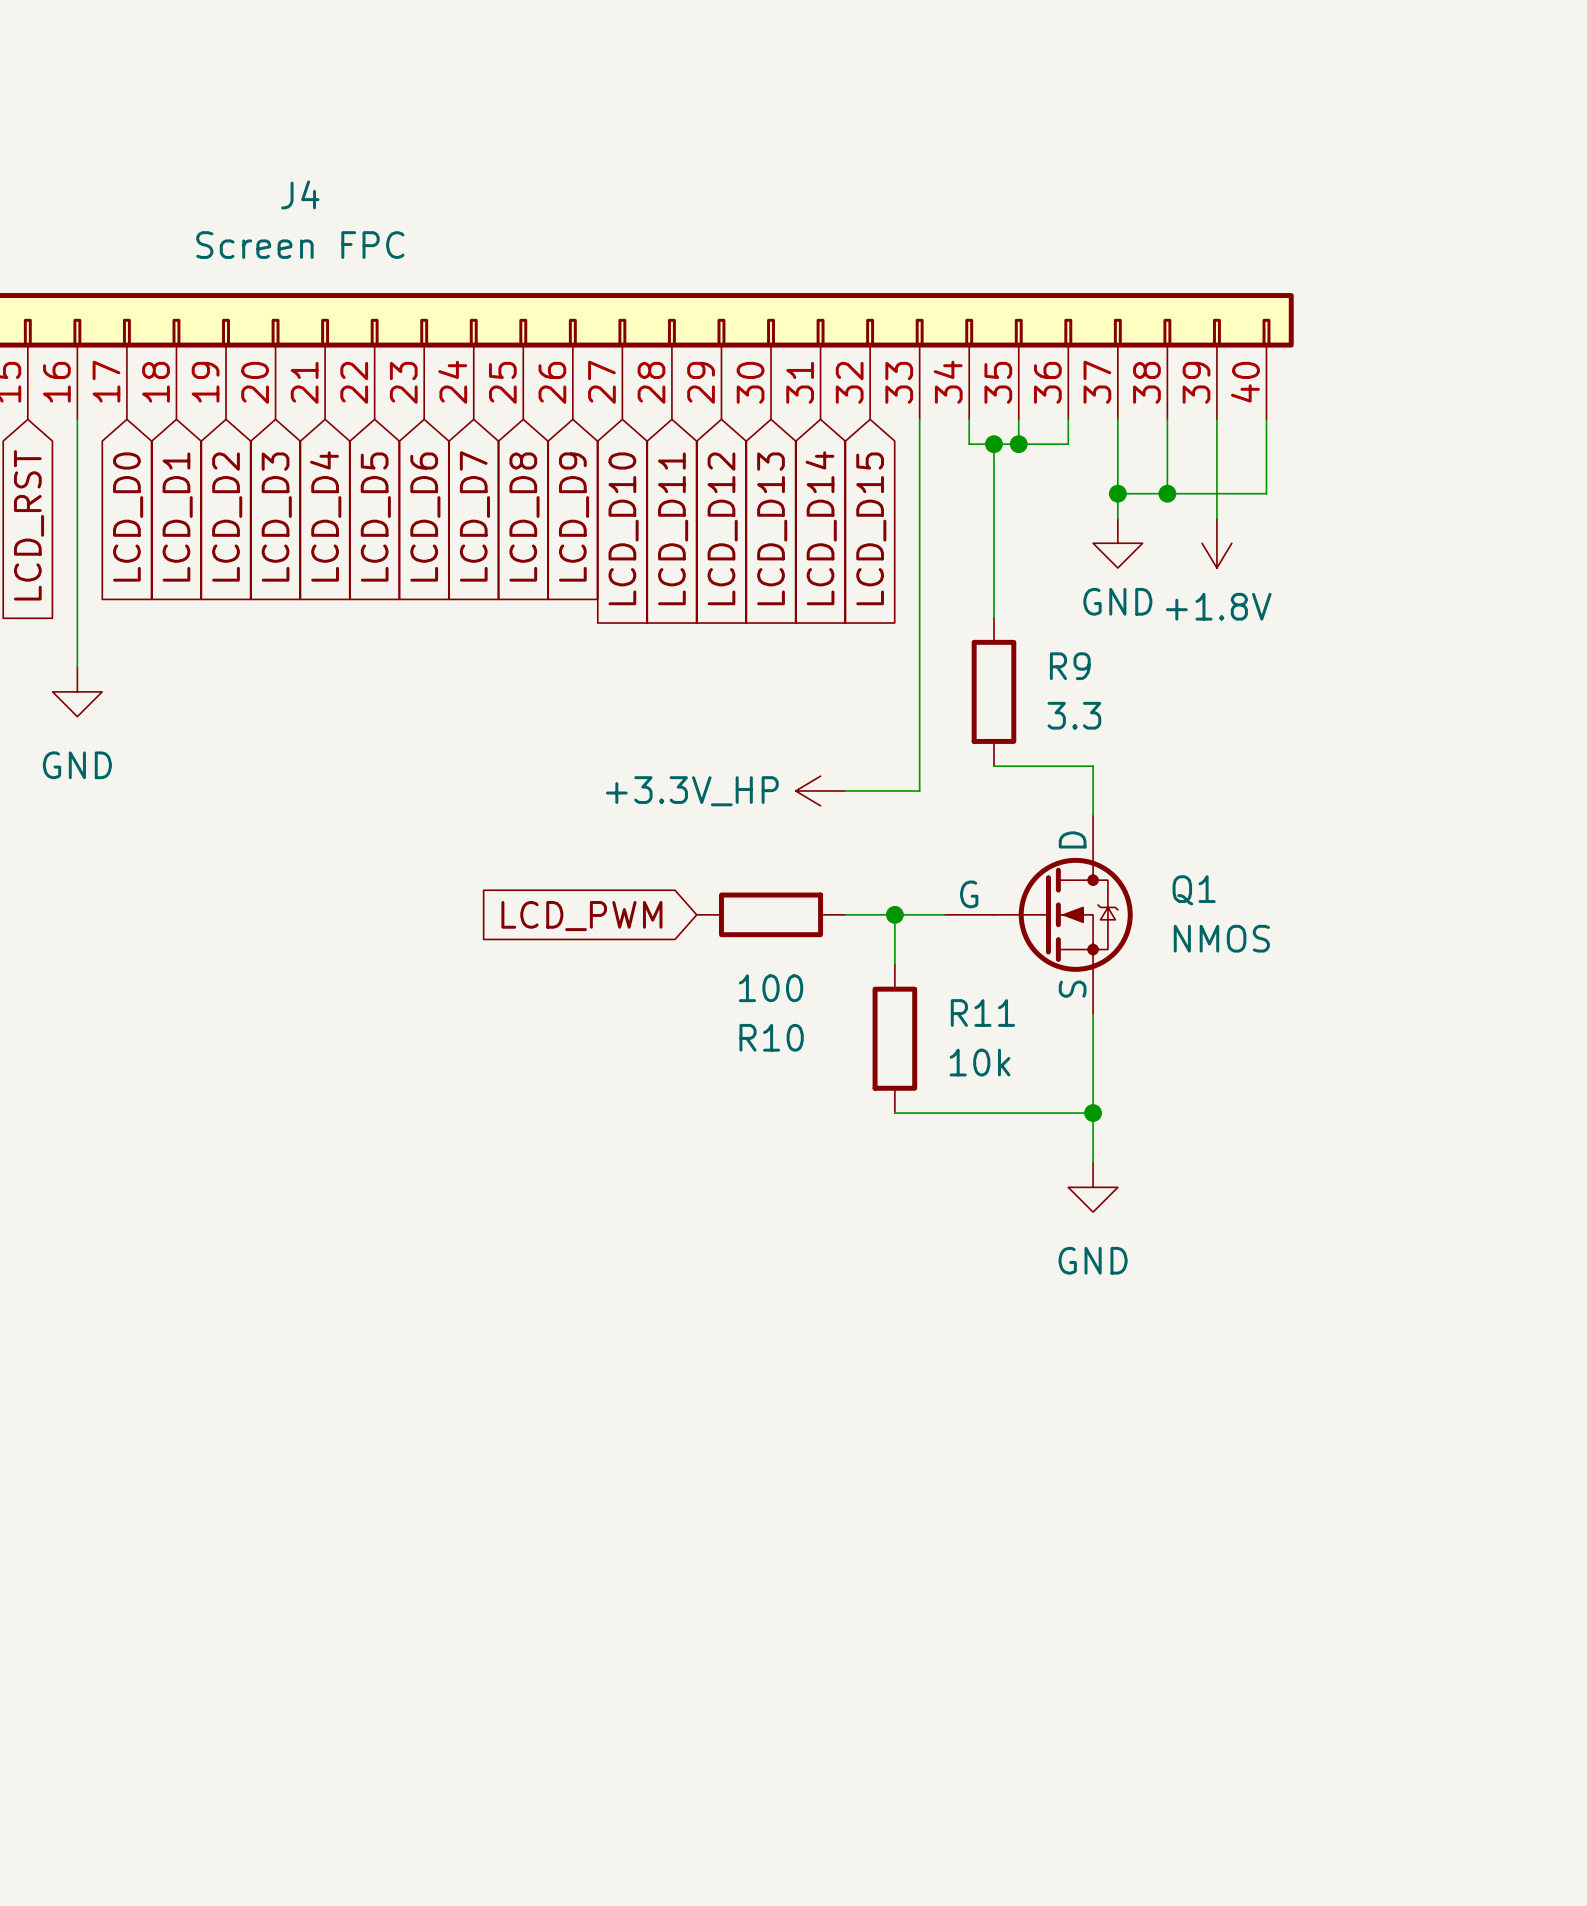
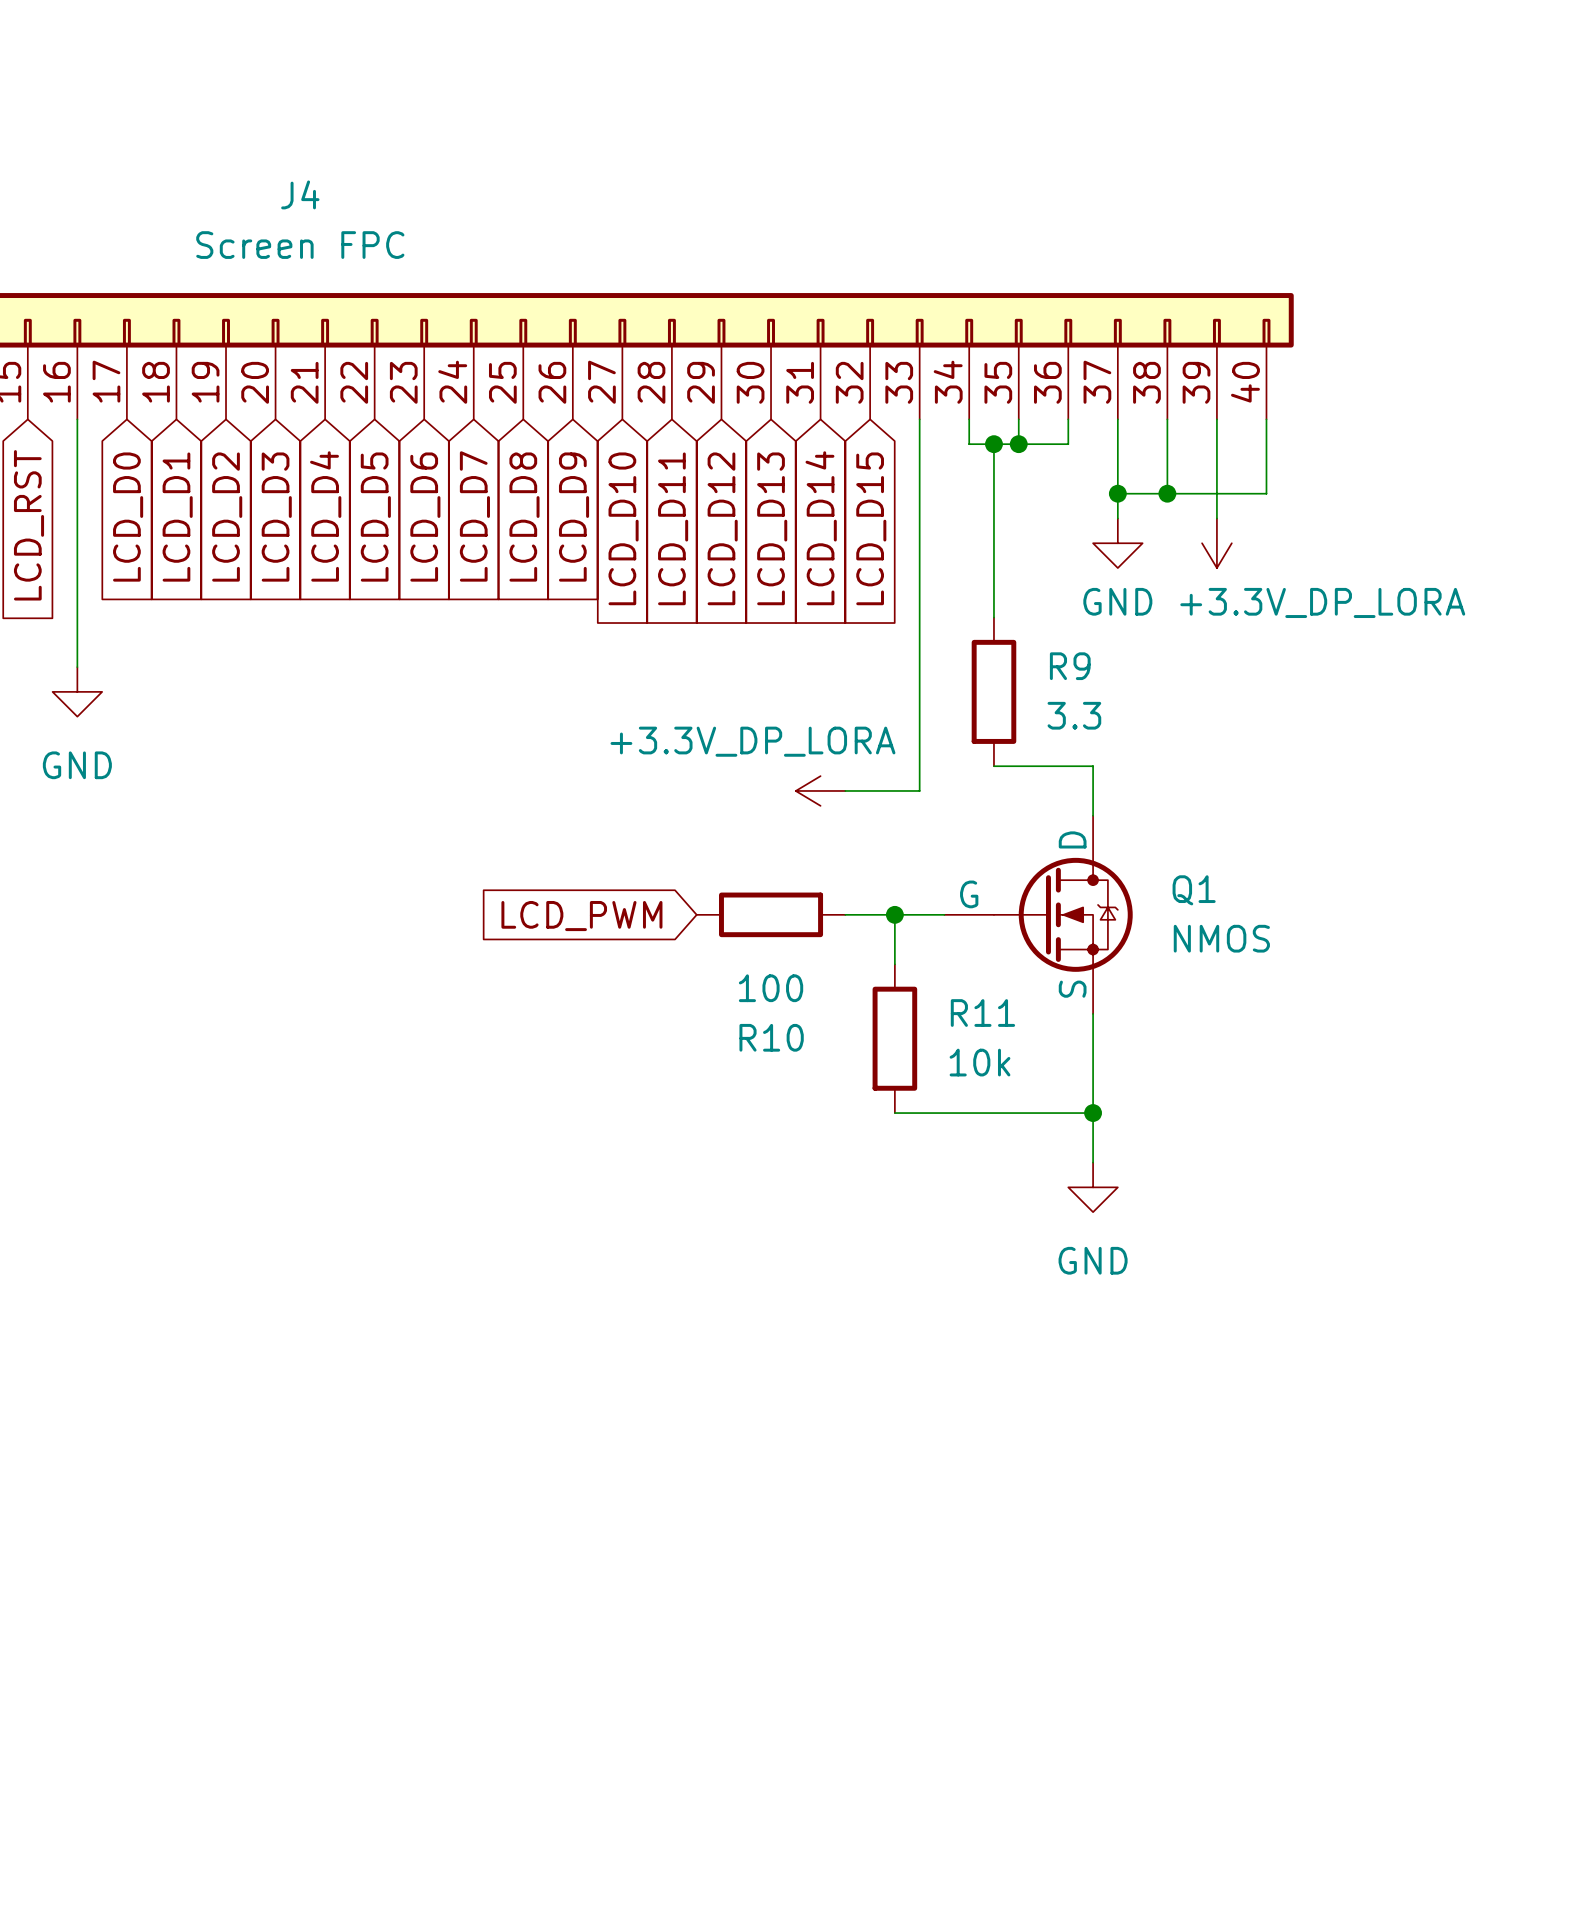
power symbol: +1.8V (1216, 543) -> +3.3V_DP_LORA (1216, 543)
power symbol: +3.3V_HP (820, 790) -> +3.3V_DP_LORA (820, 790)

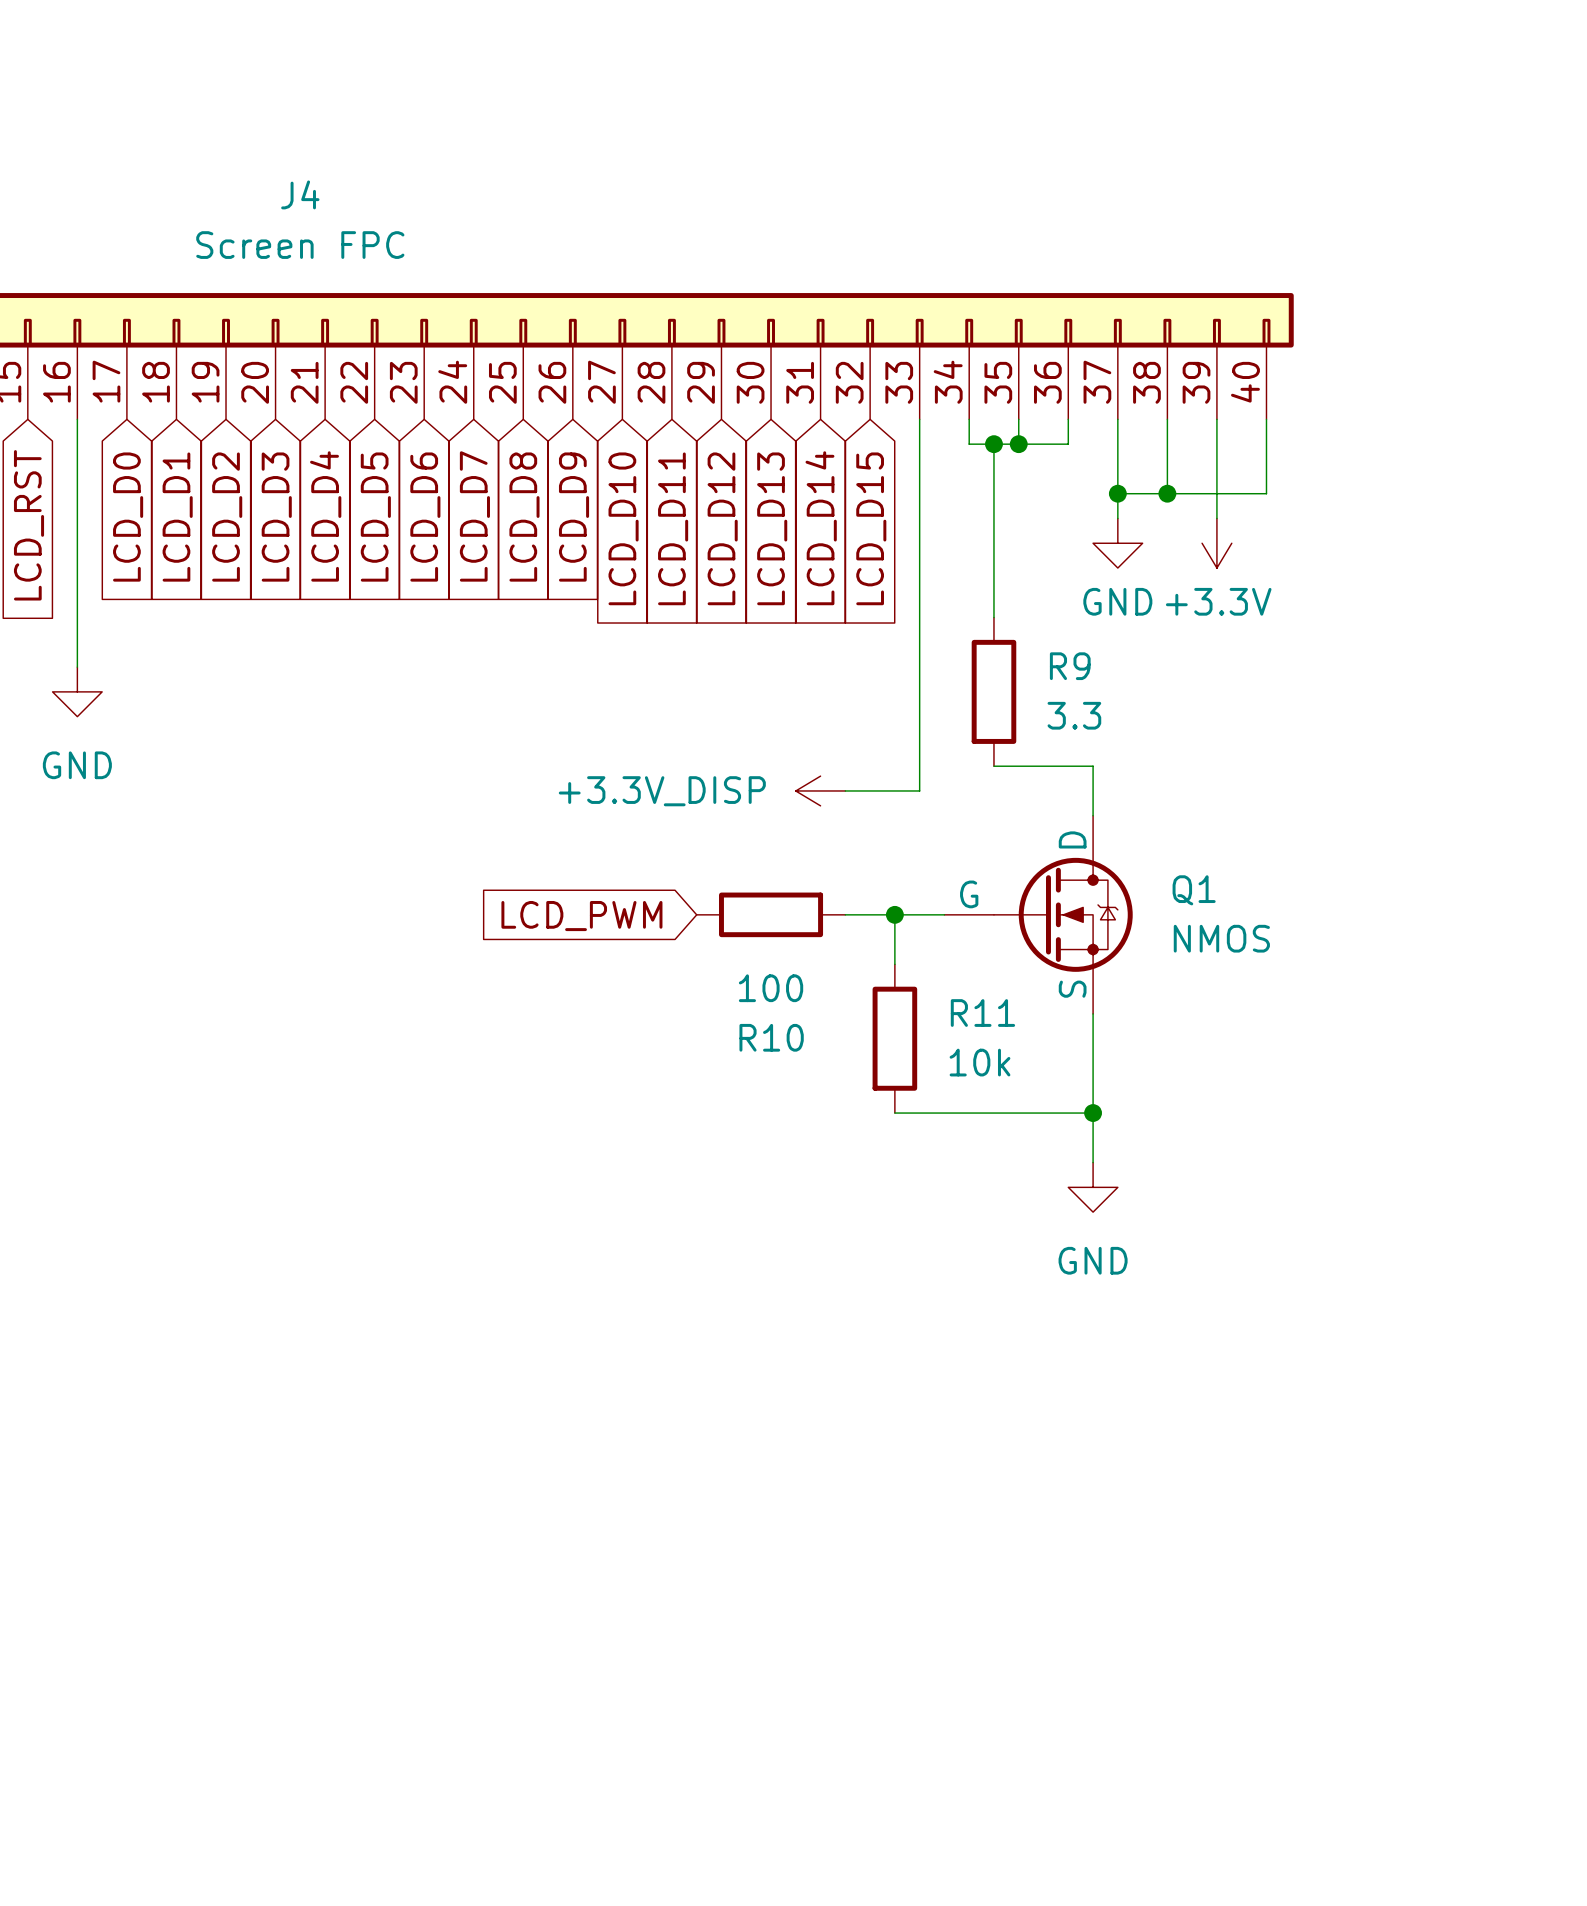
power symbol: +3.3V_DP_LORA (1216, 543) -> +3.3V (1216, 543)
power symbol: +3.3V_DP_LORA (820, 790) -> +3.3V_DISP (820, 790)

